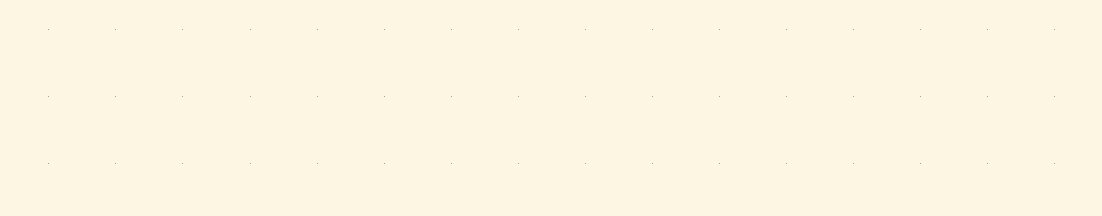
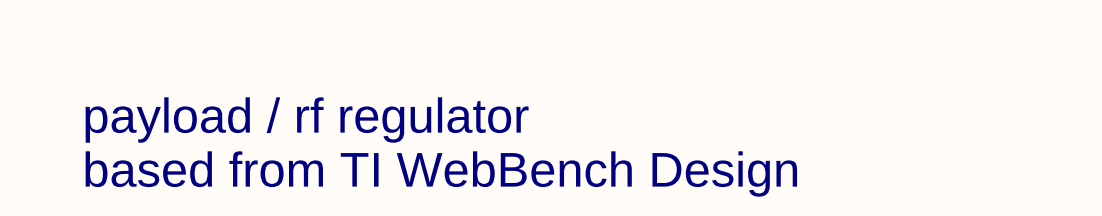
text: none -> payload / rf regulator (307, 120)
text: none -> based from TI WebBench Design (441, 173)

